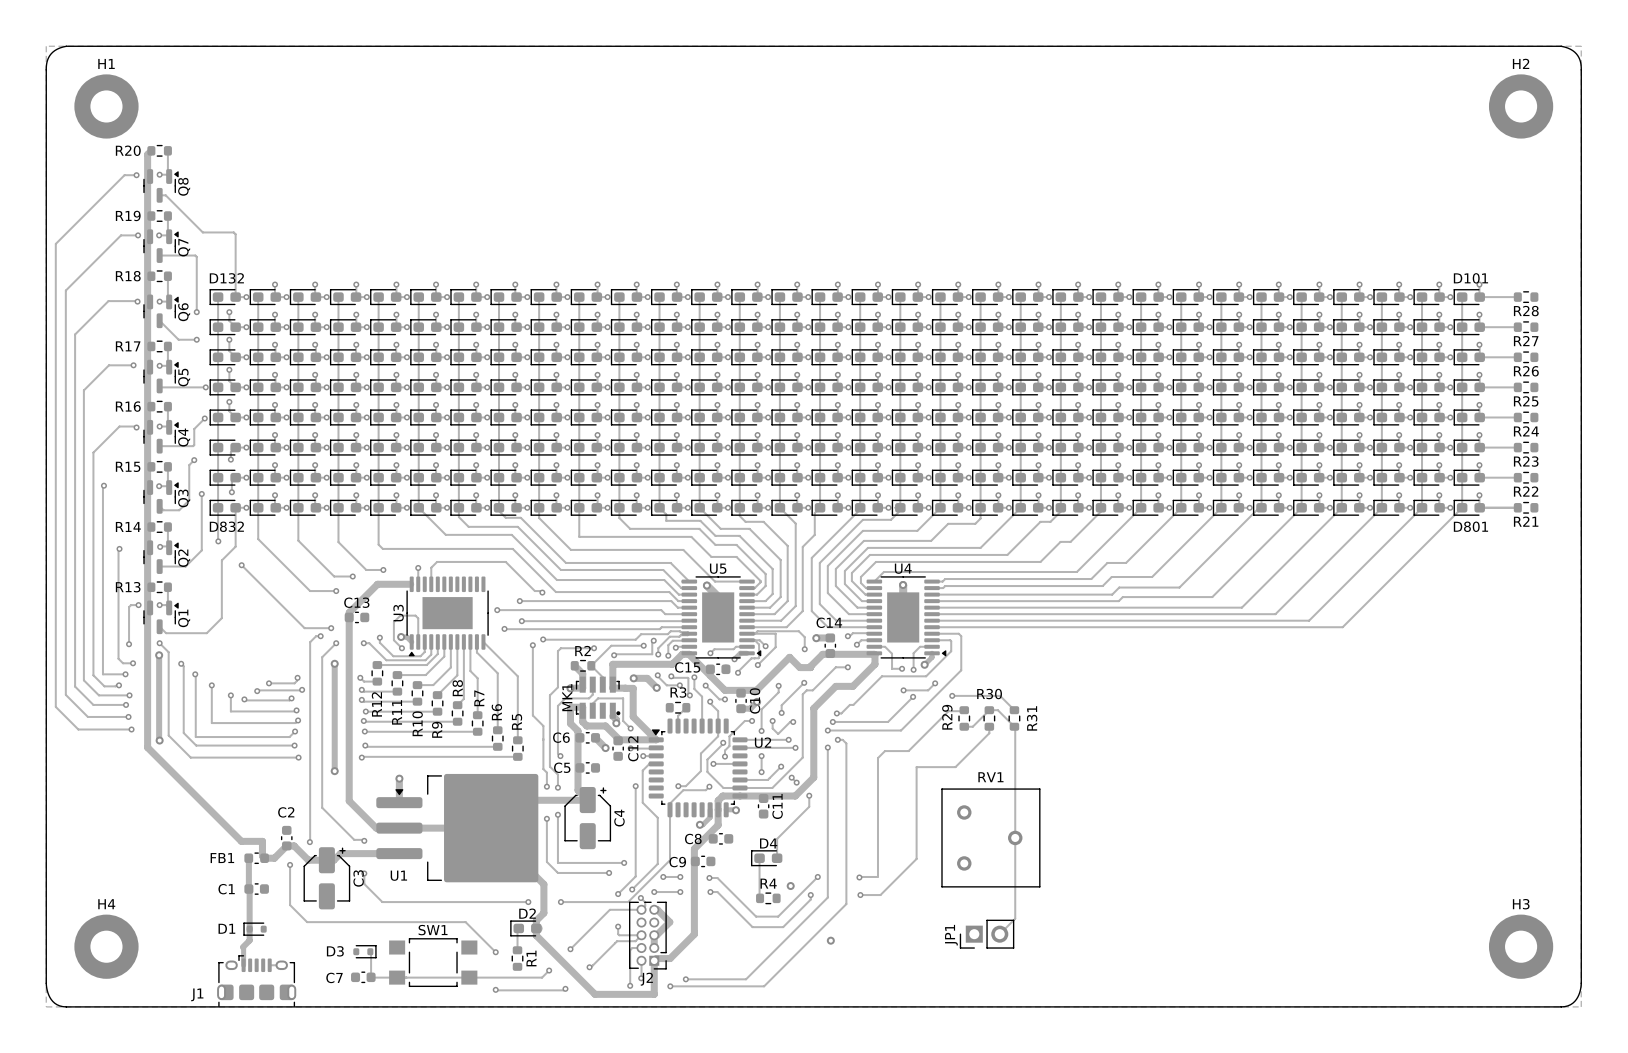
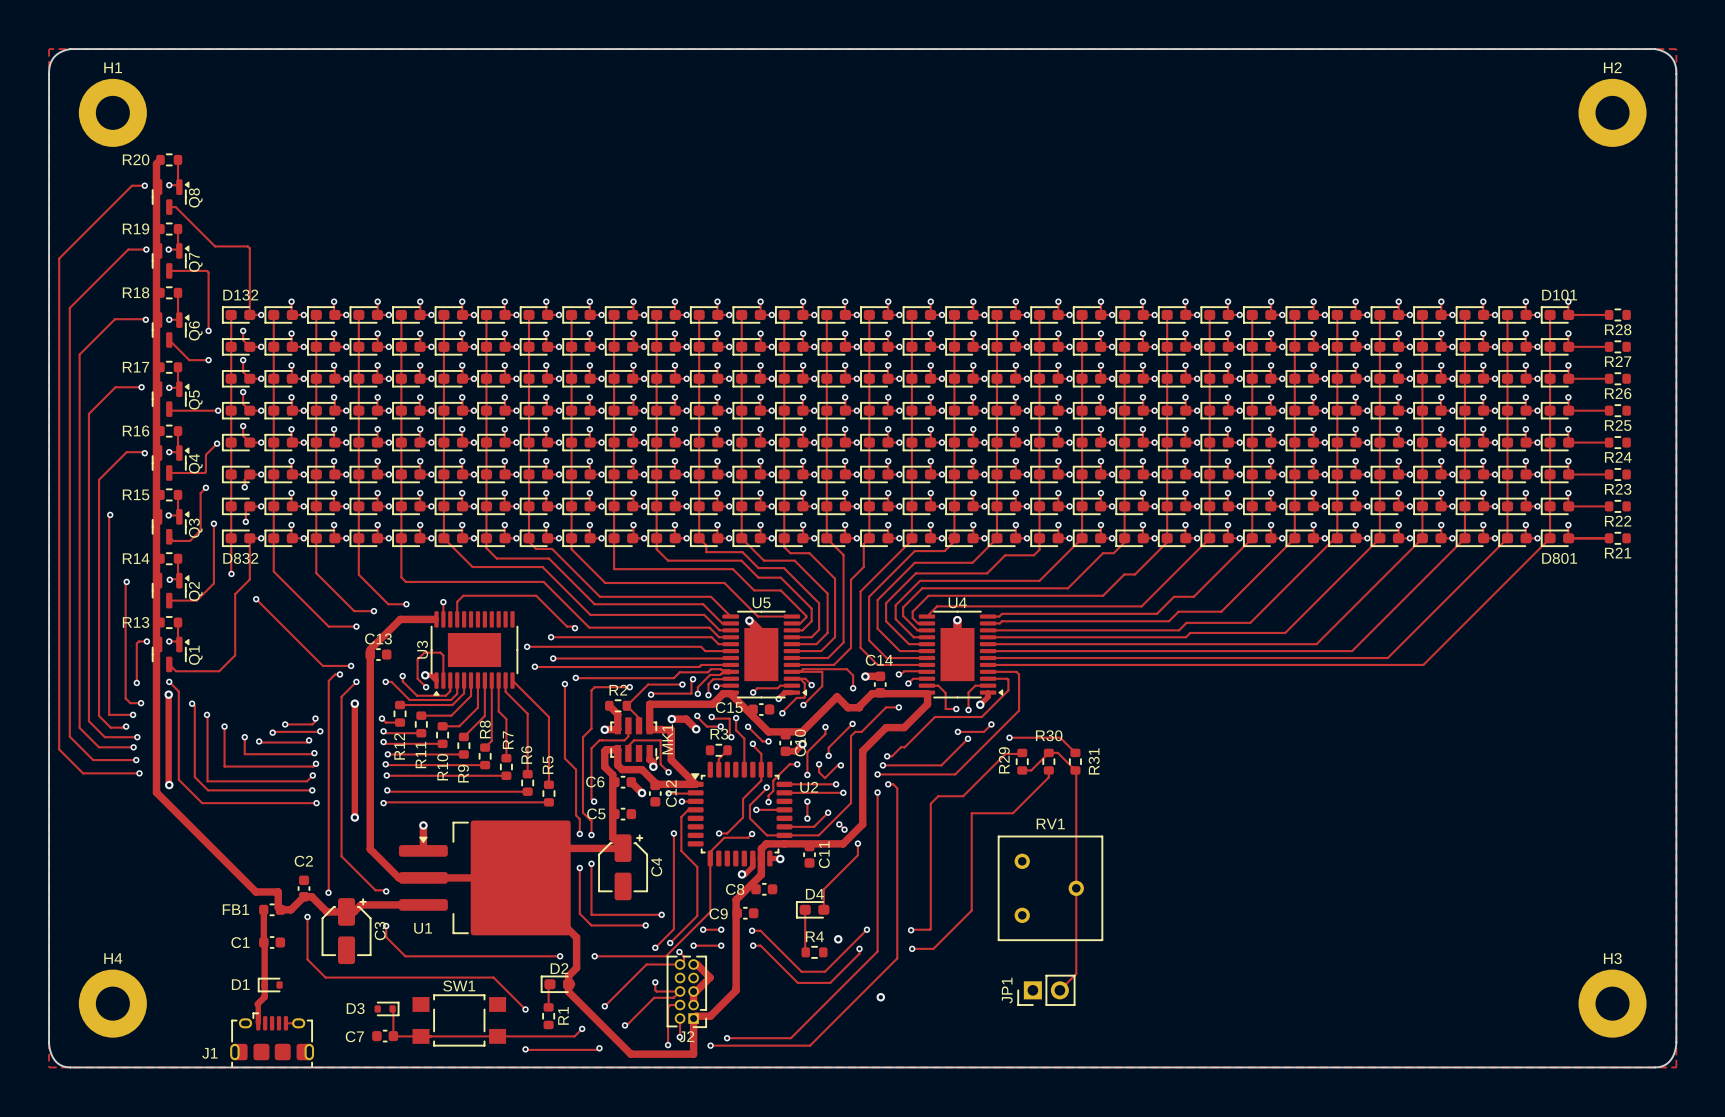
MK1 footprint: [575, 676, 621, 719] -> [610, 717, 660, 762]
MK1 name position: MK1 (567, 697) -> MK1 (667, 739)

